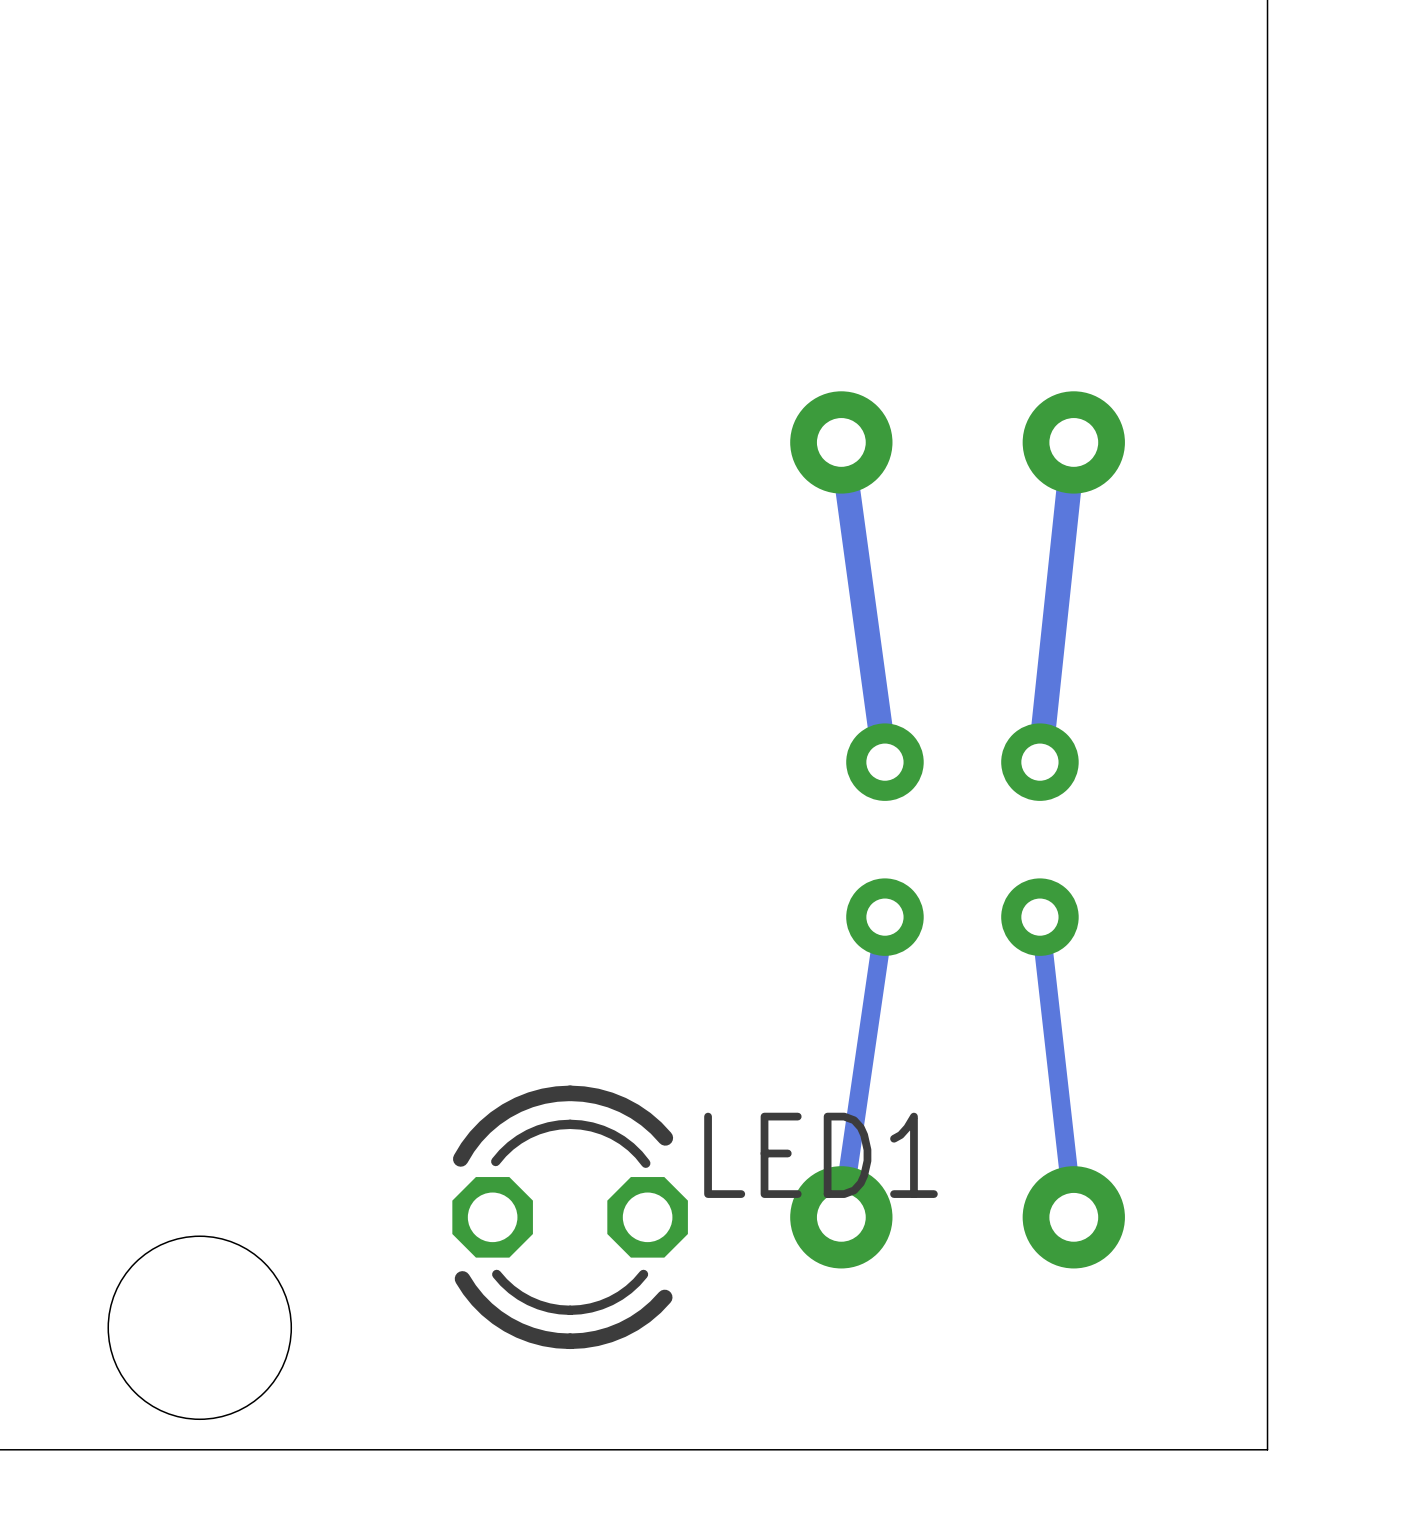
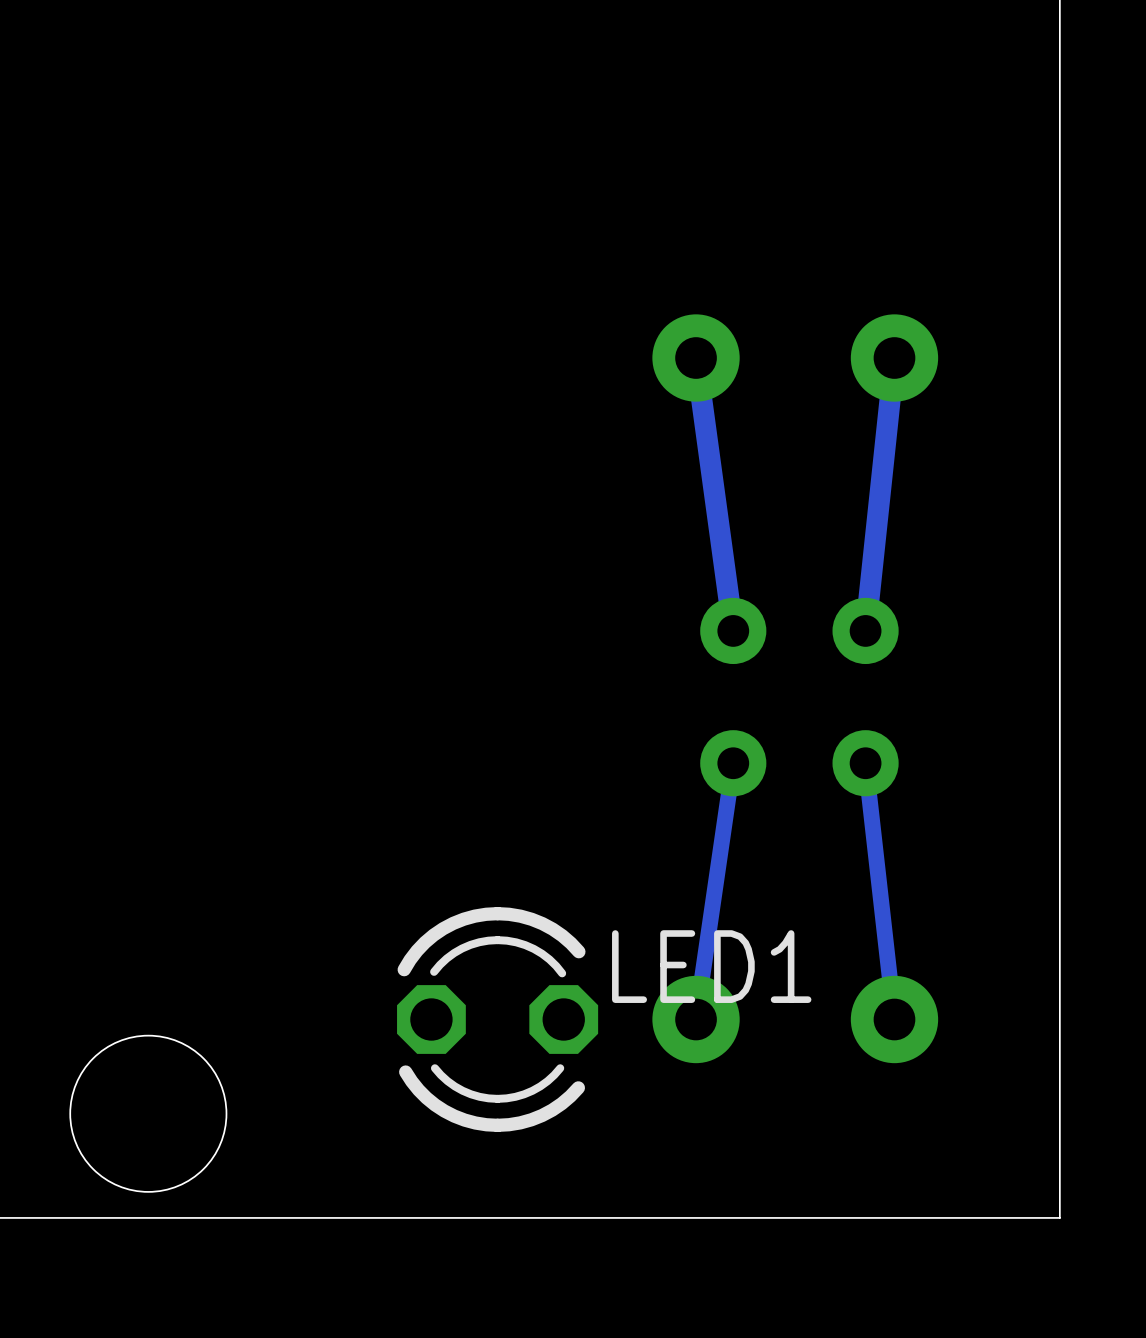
LED1 position: (570, 1217) -> (497, 1019)

